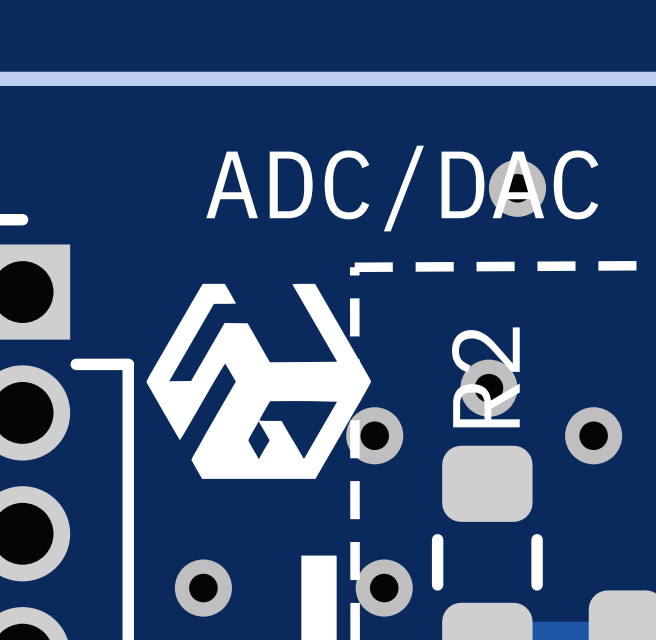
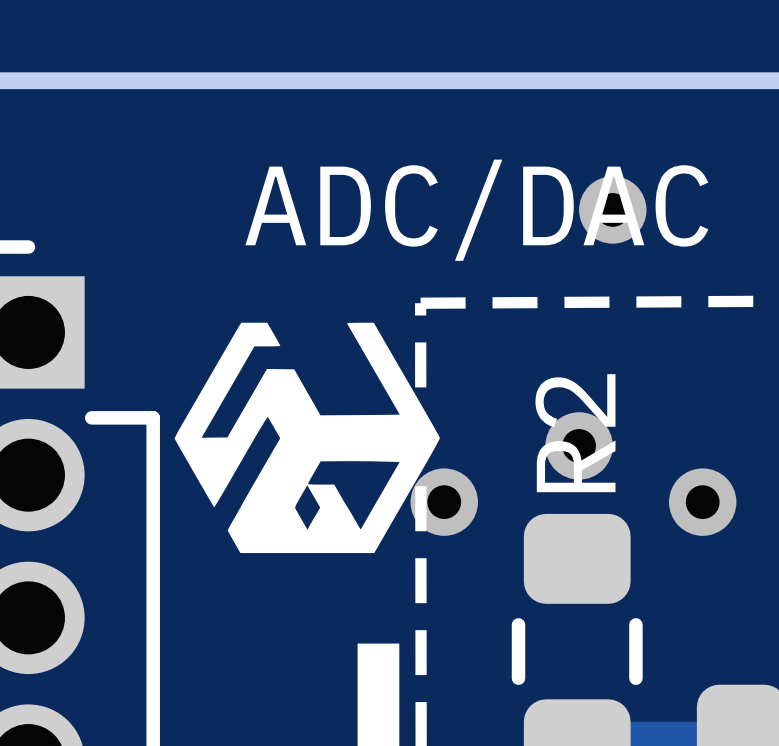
via: (203, 588) -> none
via: (384, 588) -> none

